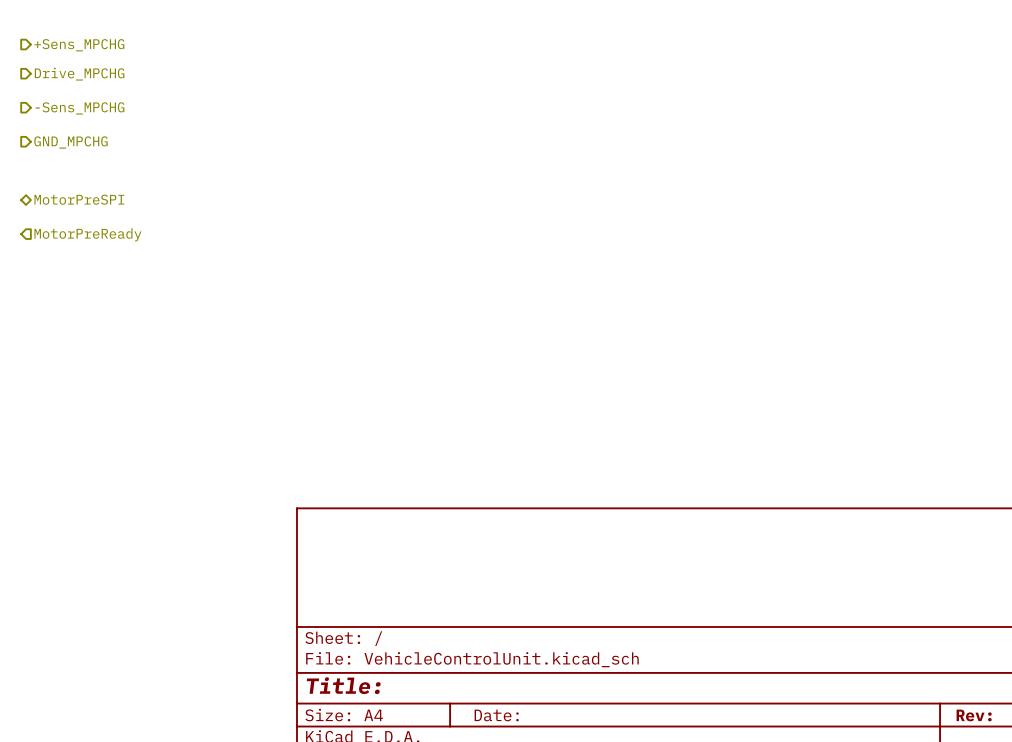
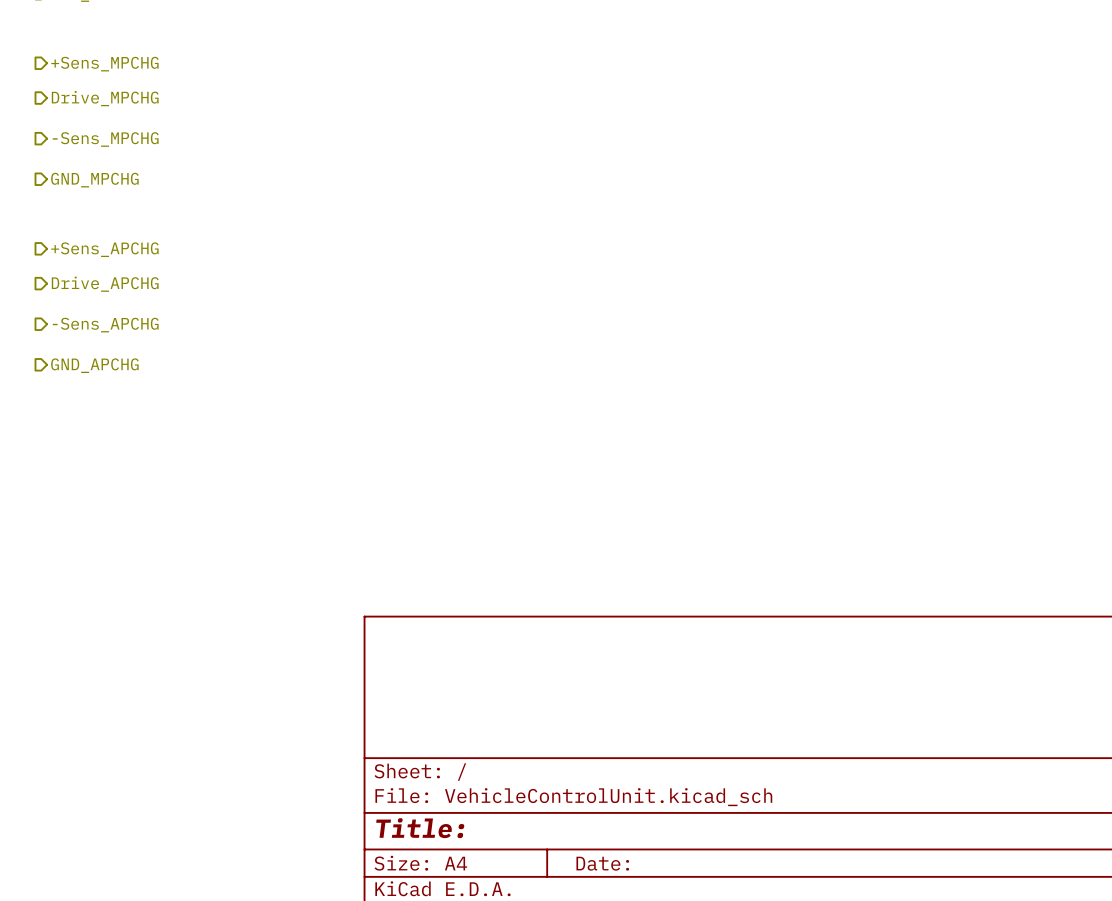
hierarchical label shape: bidirectional (79, 199) -> output (104, 249)
hierarchical label: MotorPreSPI (79, 199) -> +Sens_APCHG (104, 249)
hierarchical label shape: input (87, 234) -> output (105, 284)
hierarchical label: MotorPreReady (87, 234) -> Drive_APCHG (105, 284)
hierarchical label: none -> -Sens_APCHG (105, 325)
hierarchical label: none -> GND_APCHG (94, 365)

